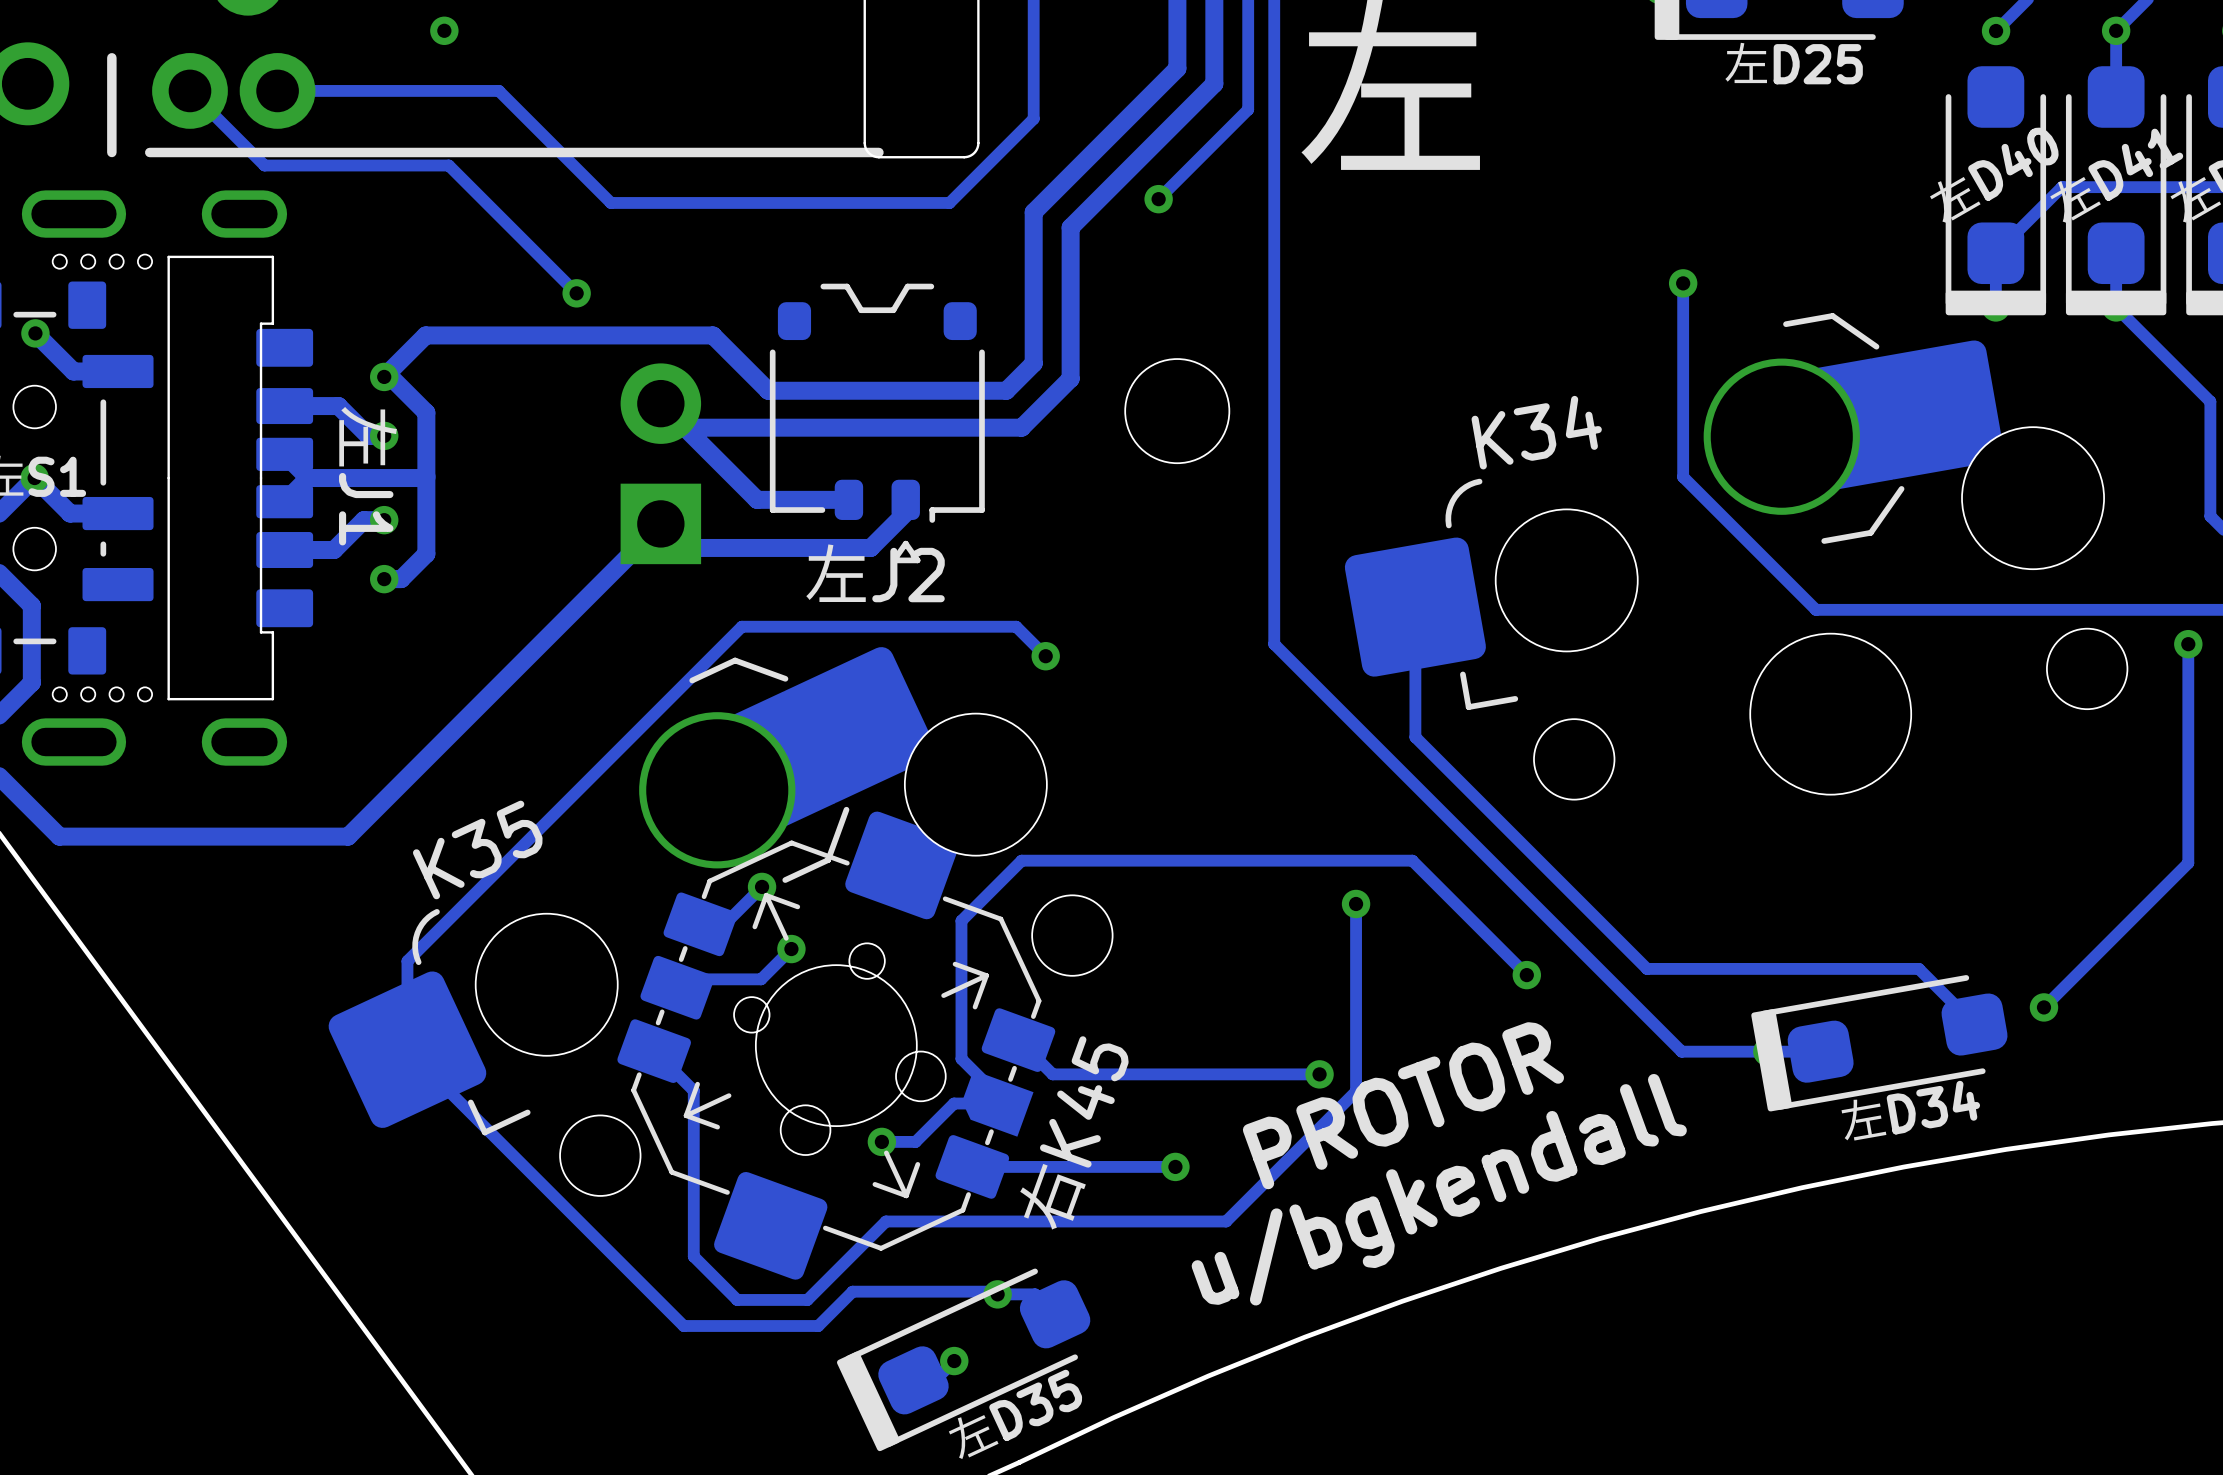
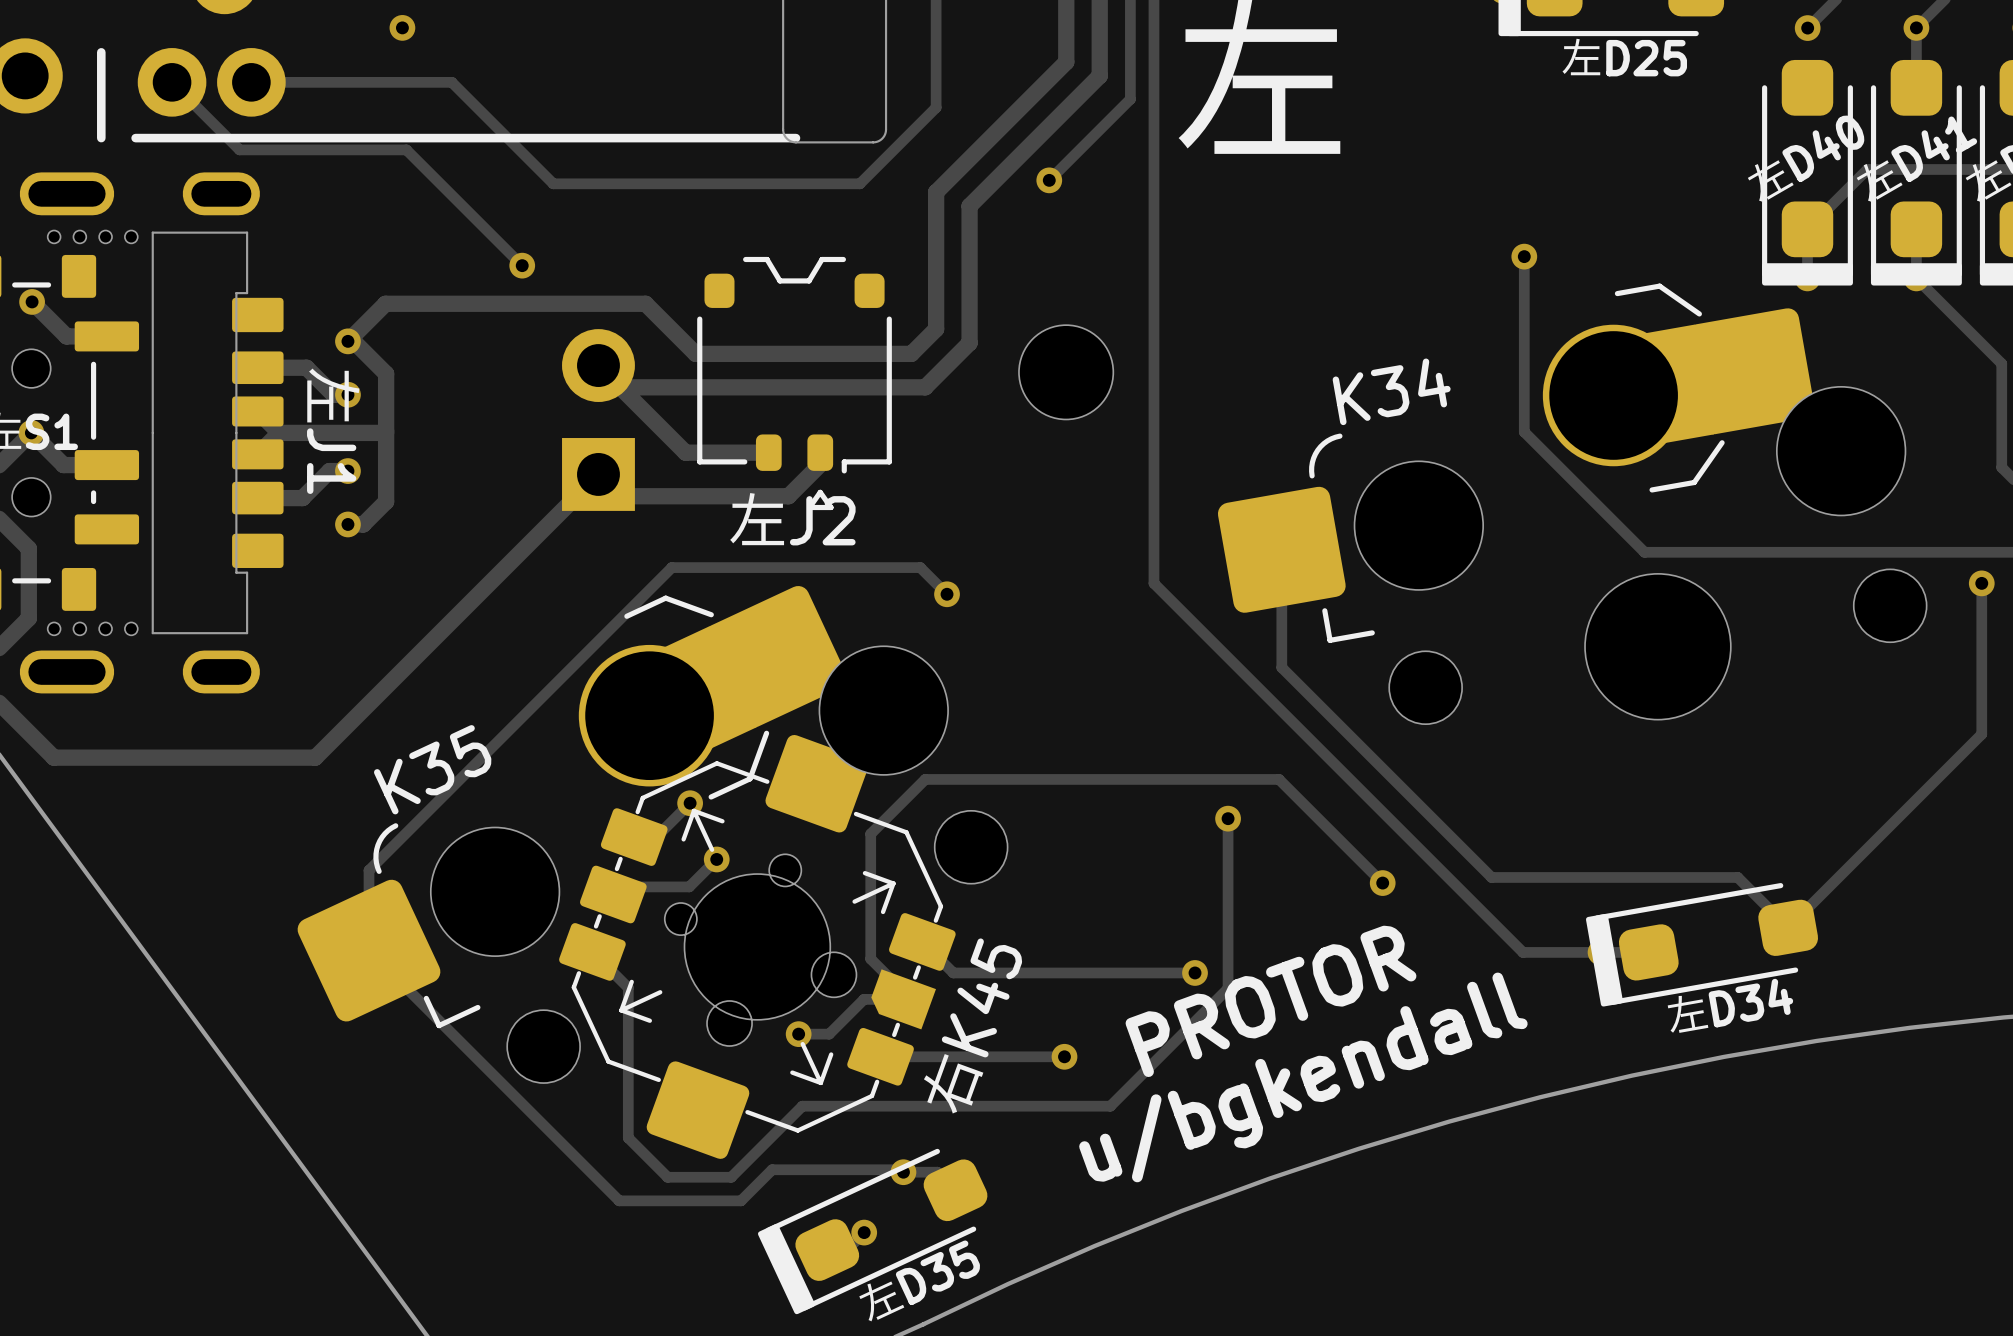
track: (2188, 810) (2188, 863) (2043, 1007) -> (1981, 734) (1788, 927)
via: (2043, 1007) -> none

